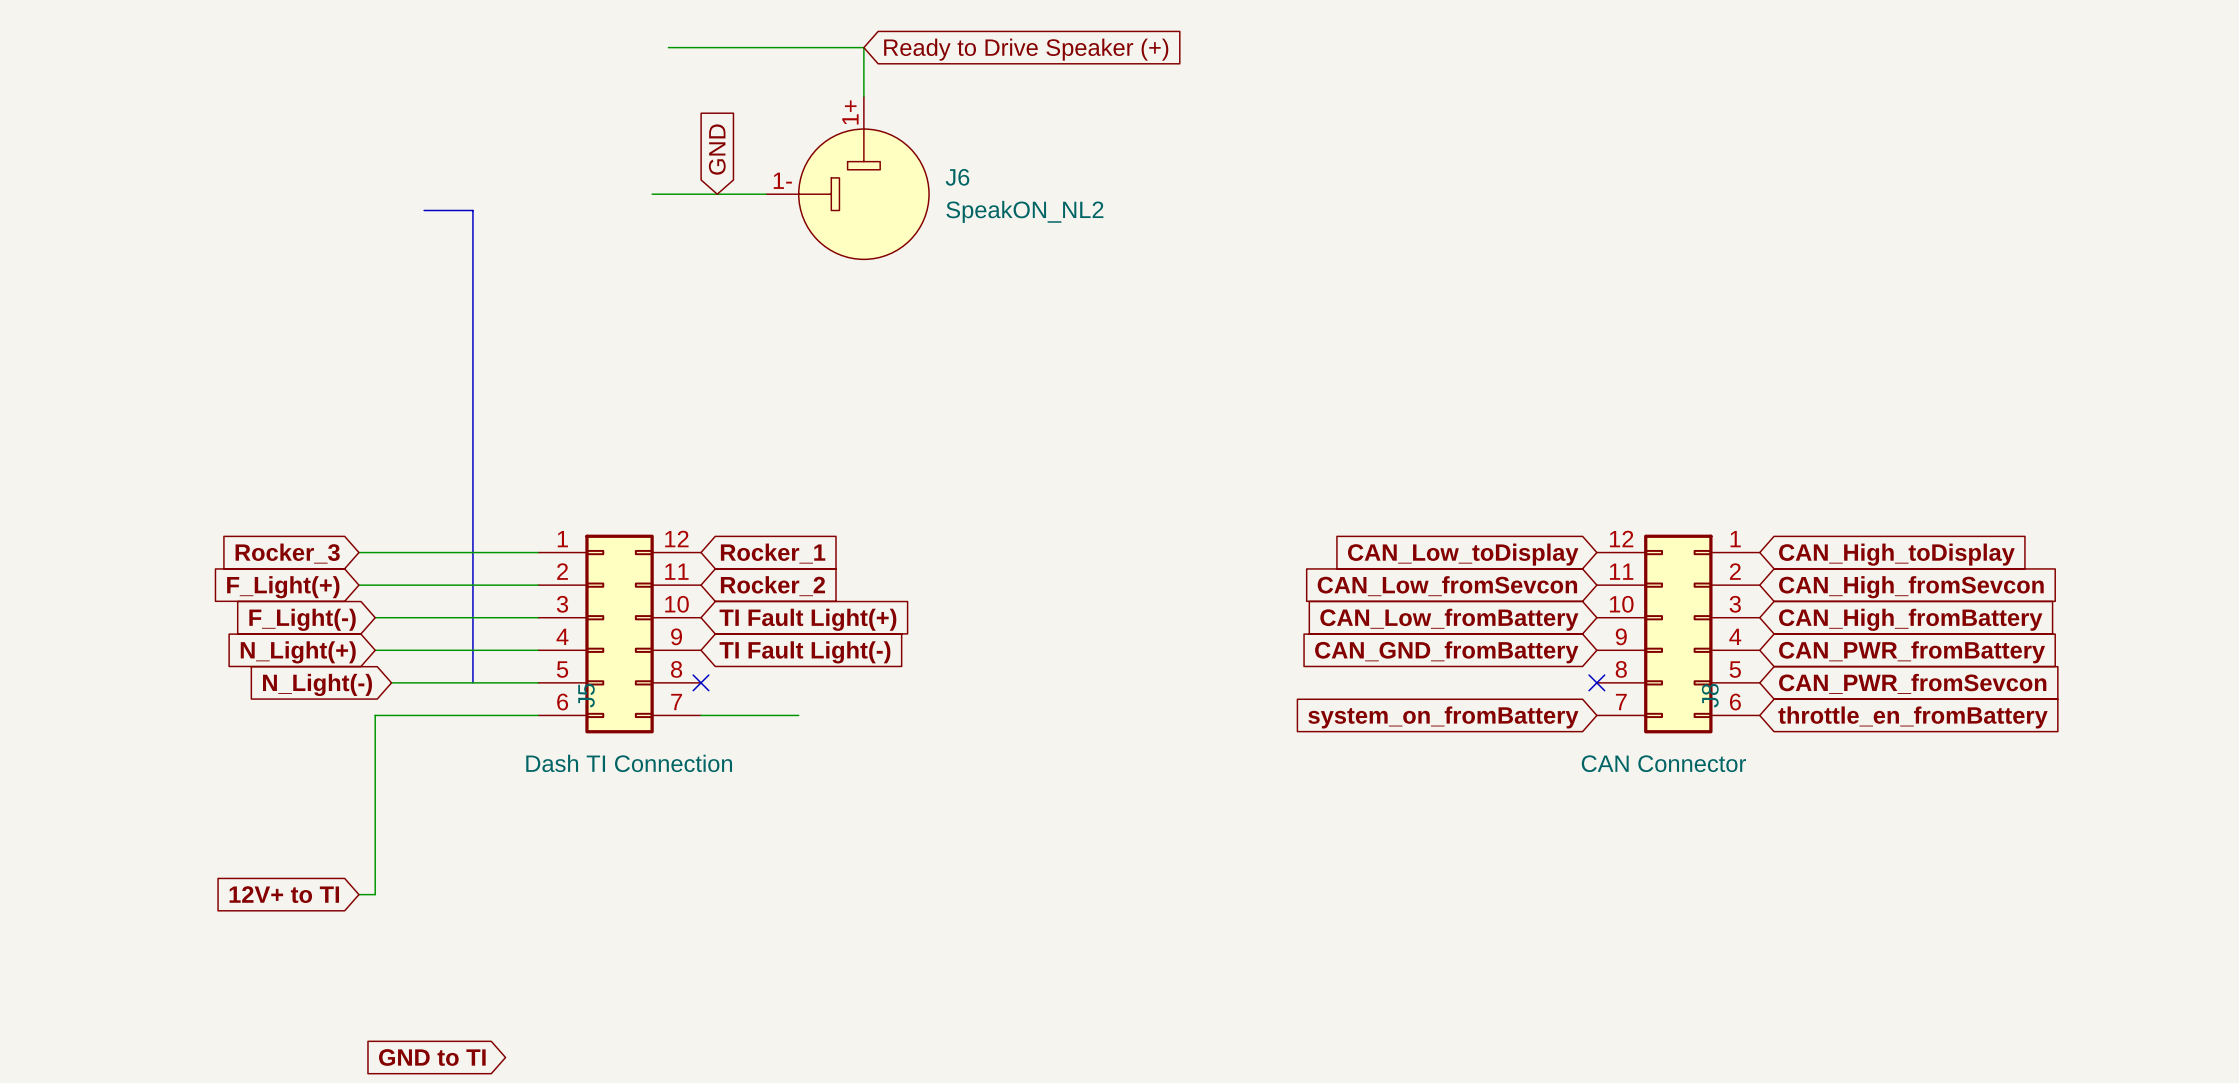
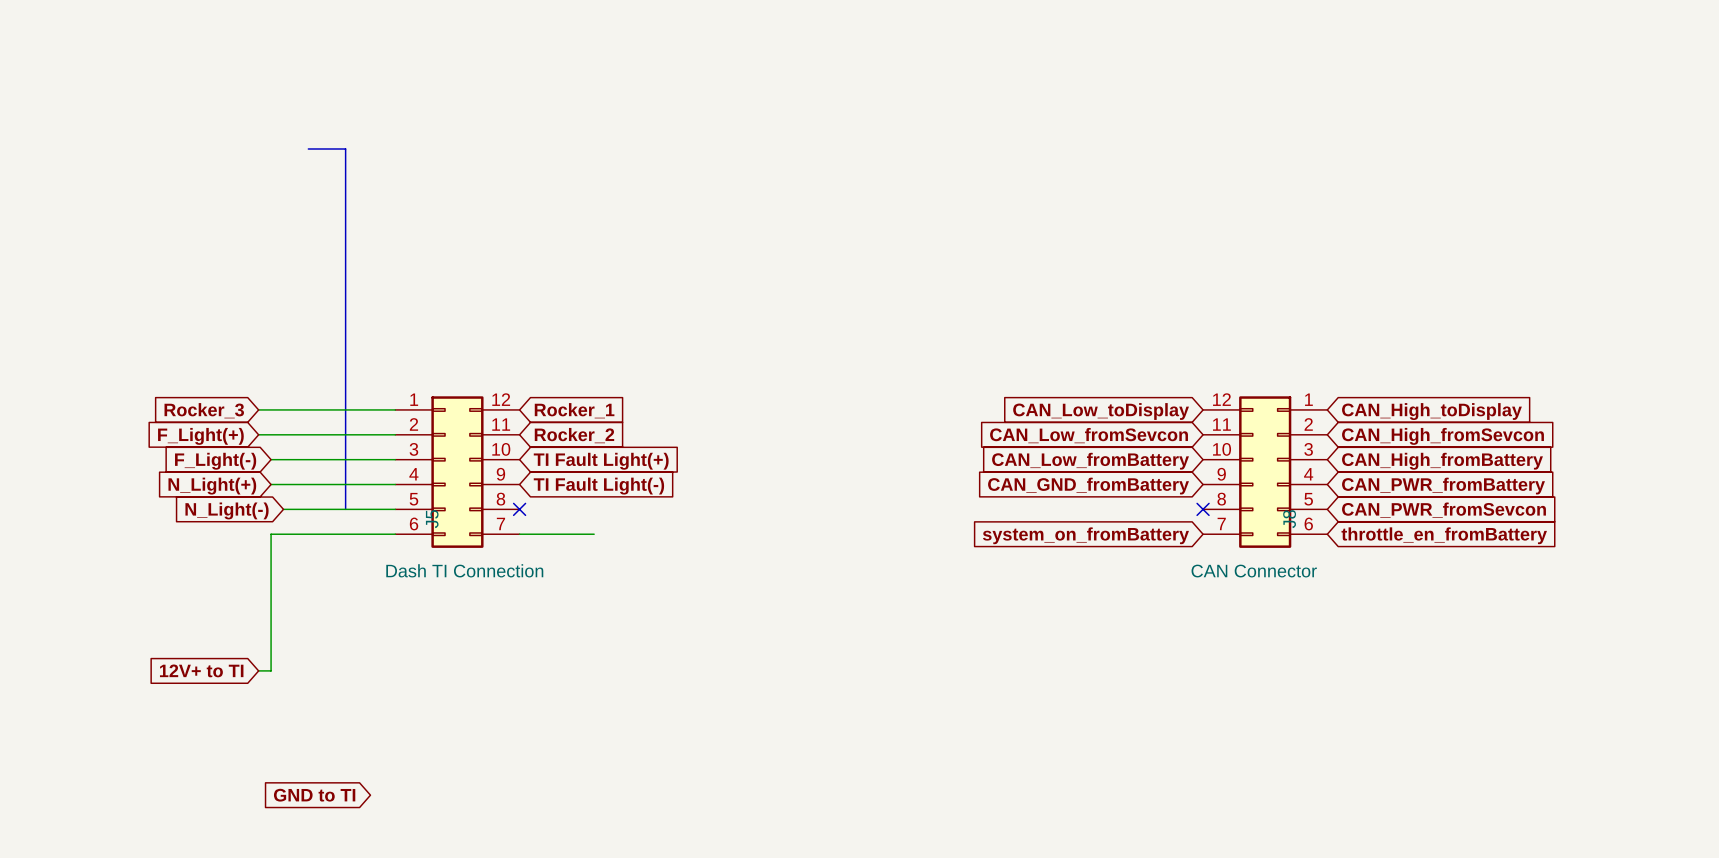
wire: (668, 47) (863, 47) (863, 96) -> none
global label: Ready to Drive Speaker (+) (1026, 49) -> none
global label: GND (717, 149) -> none
J6: SpeakON_NL2 (847, 177) -> none
wire: (652, 194) (766, 194) -> none

